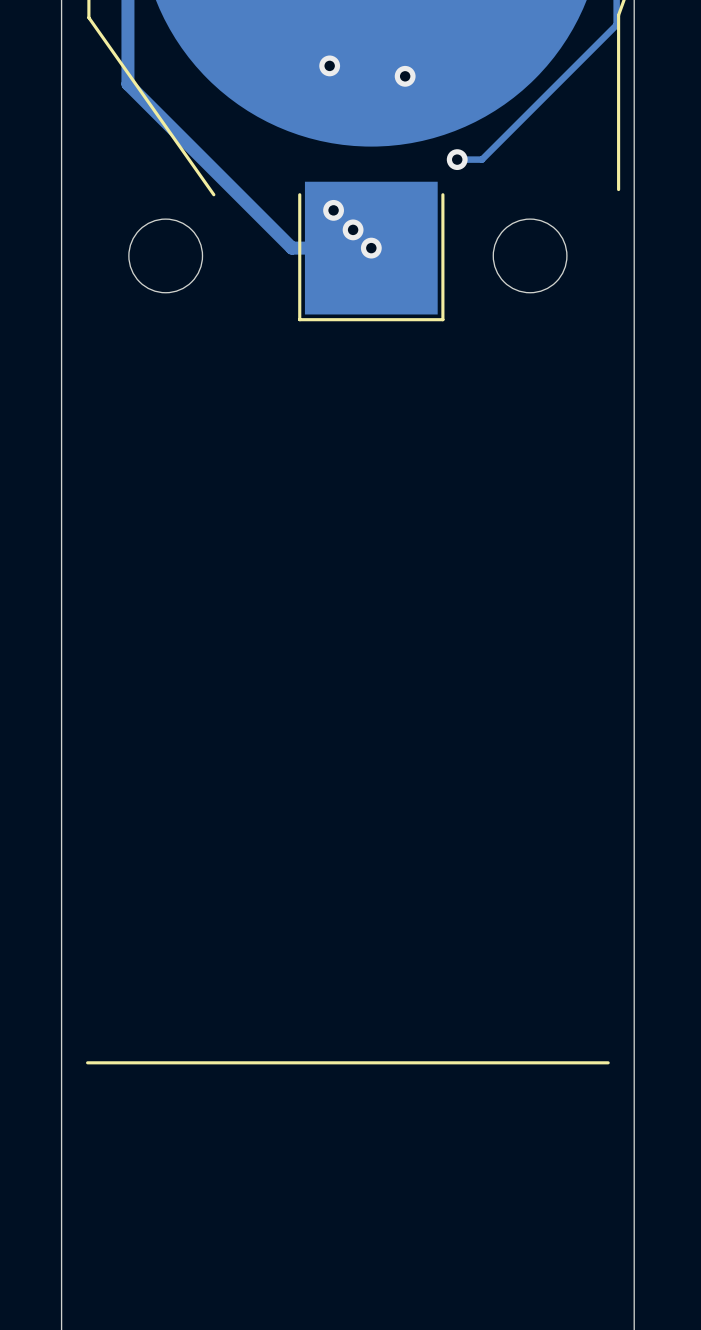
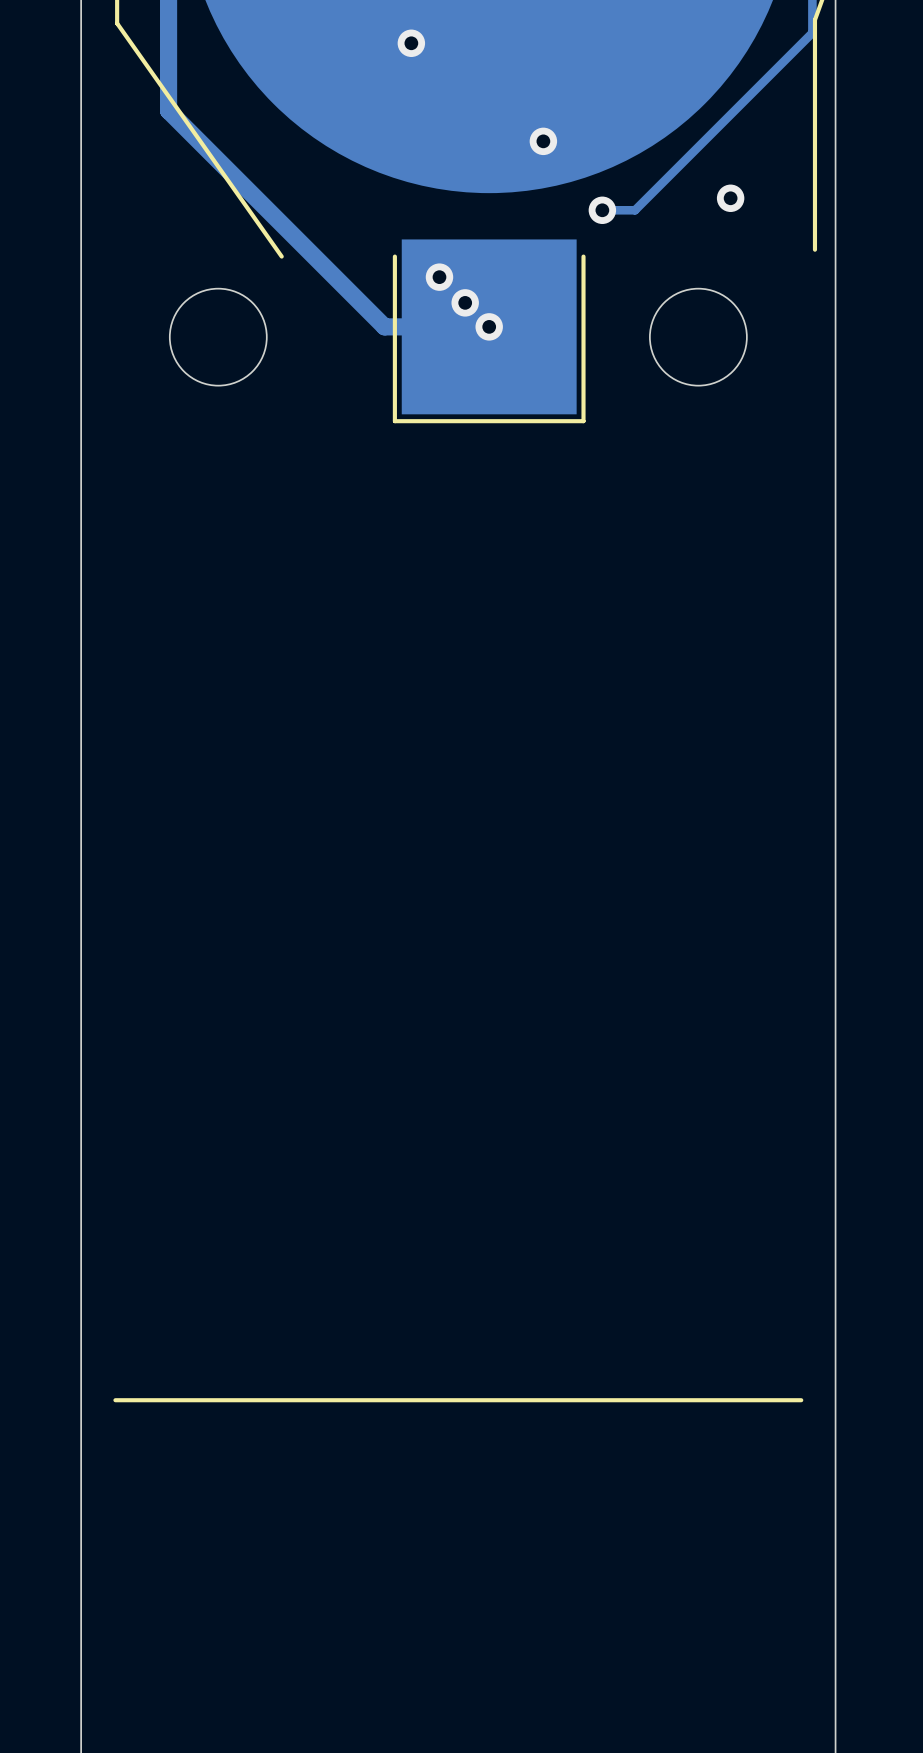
via position: (329, 65) -> (411, 43)
via position: (405, 76) -> (543, 141)
via: none -> (730, 198)

